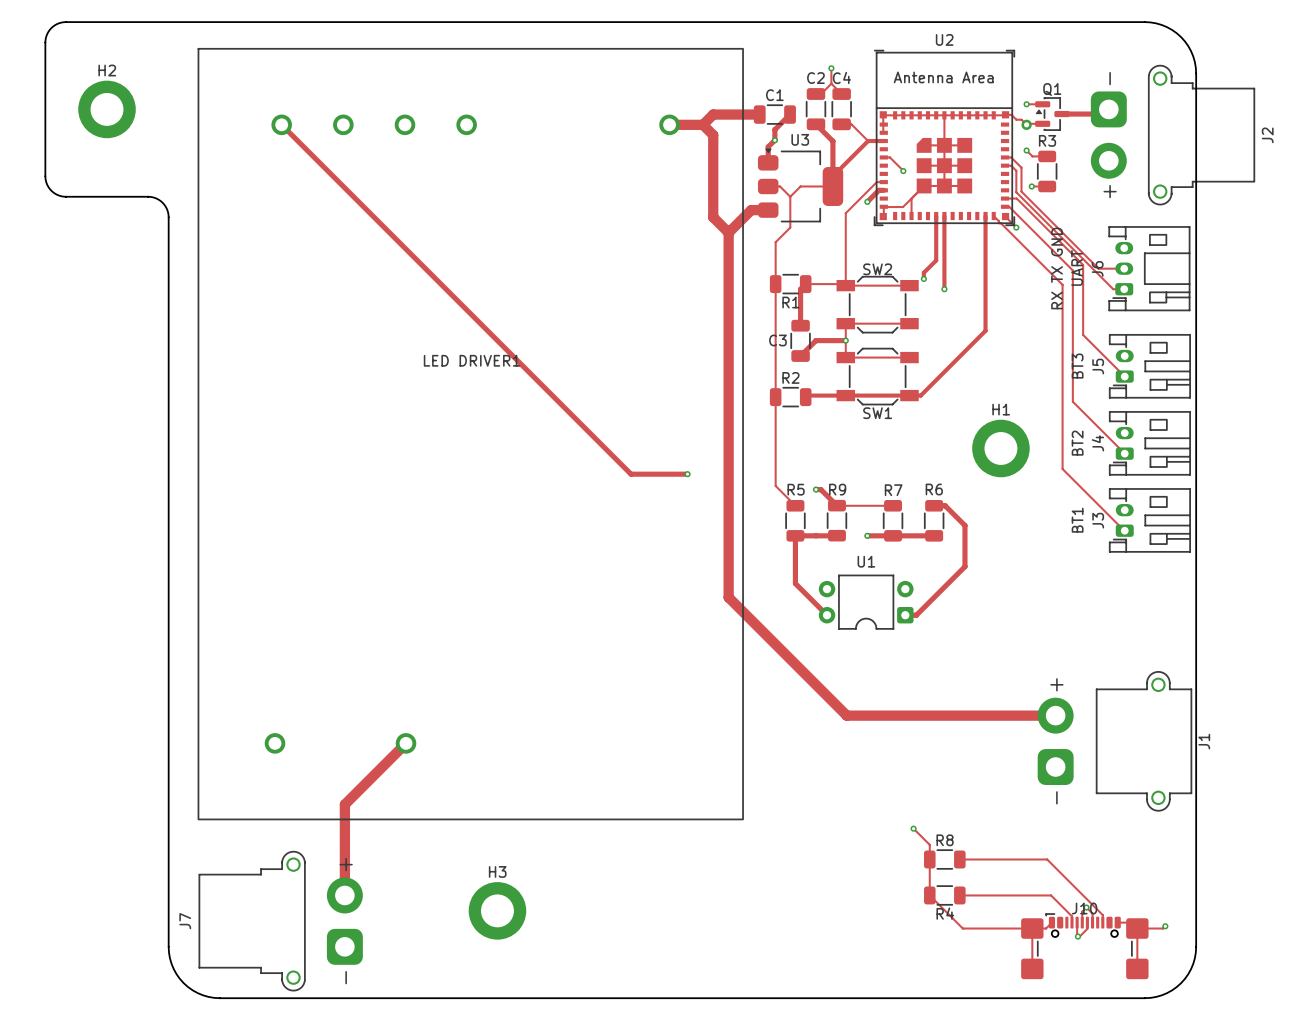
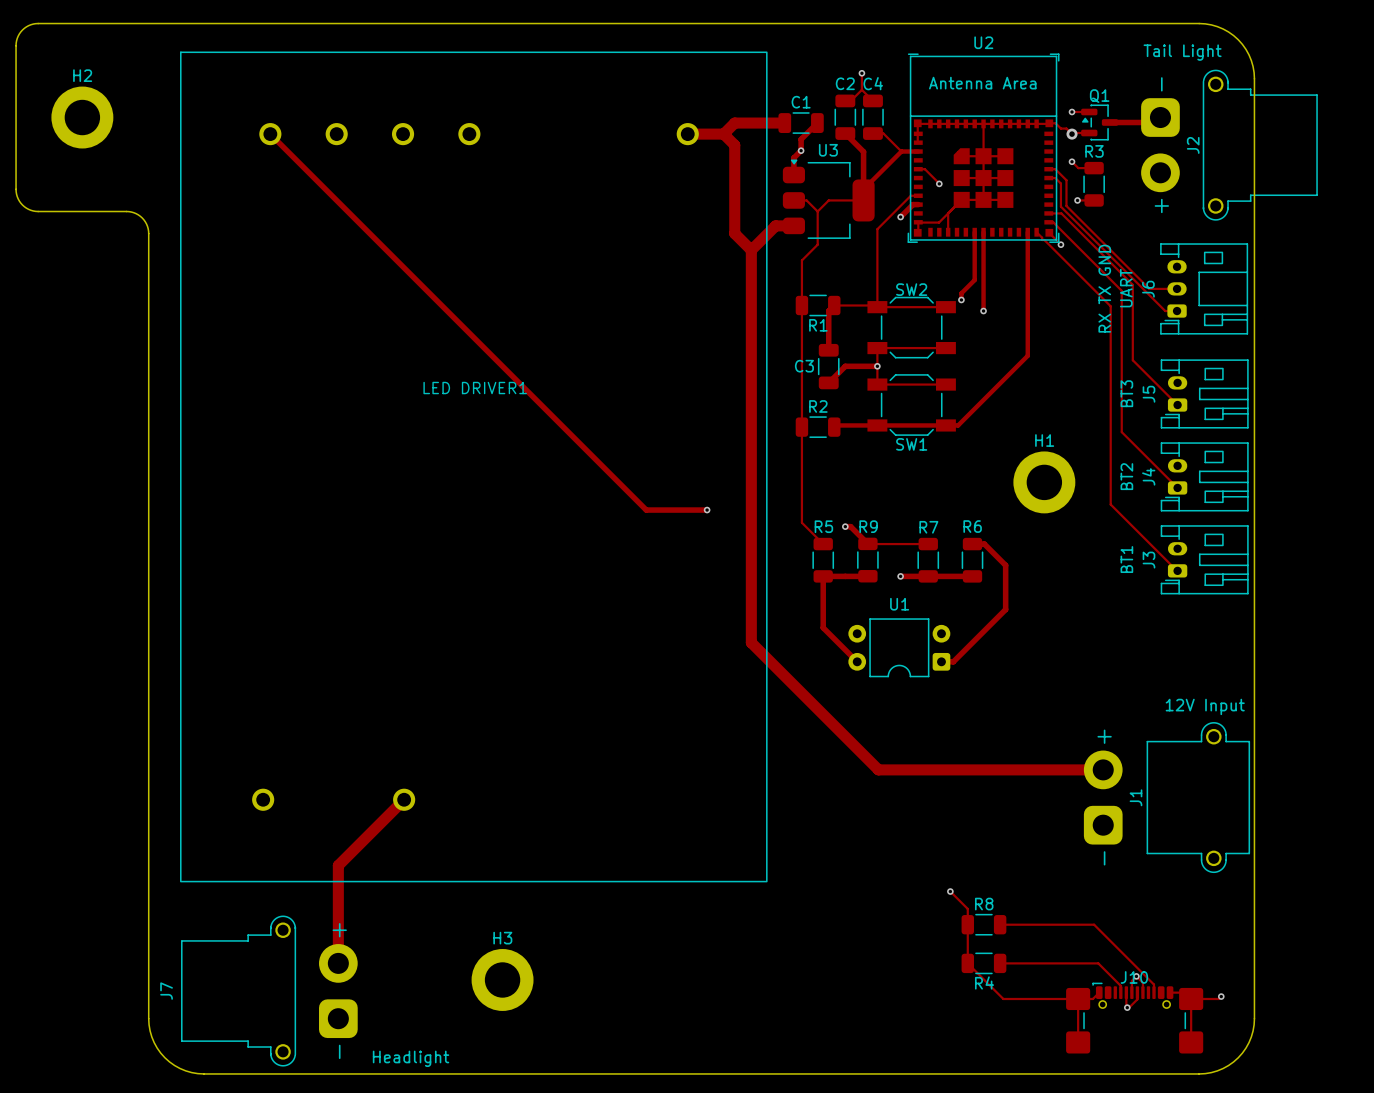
J2 value: none -> Tail Light (1182, 52)
J2 name position: J2 (1267, 135) -> J2 (1193, 145)
J1 value: none -> 12V Input (1205, 706)
J1 name position: J1 (1204, 741) -> J1 (1136, 797)
J7 value: none -> Headlight (411, 1058)

